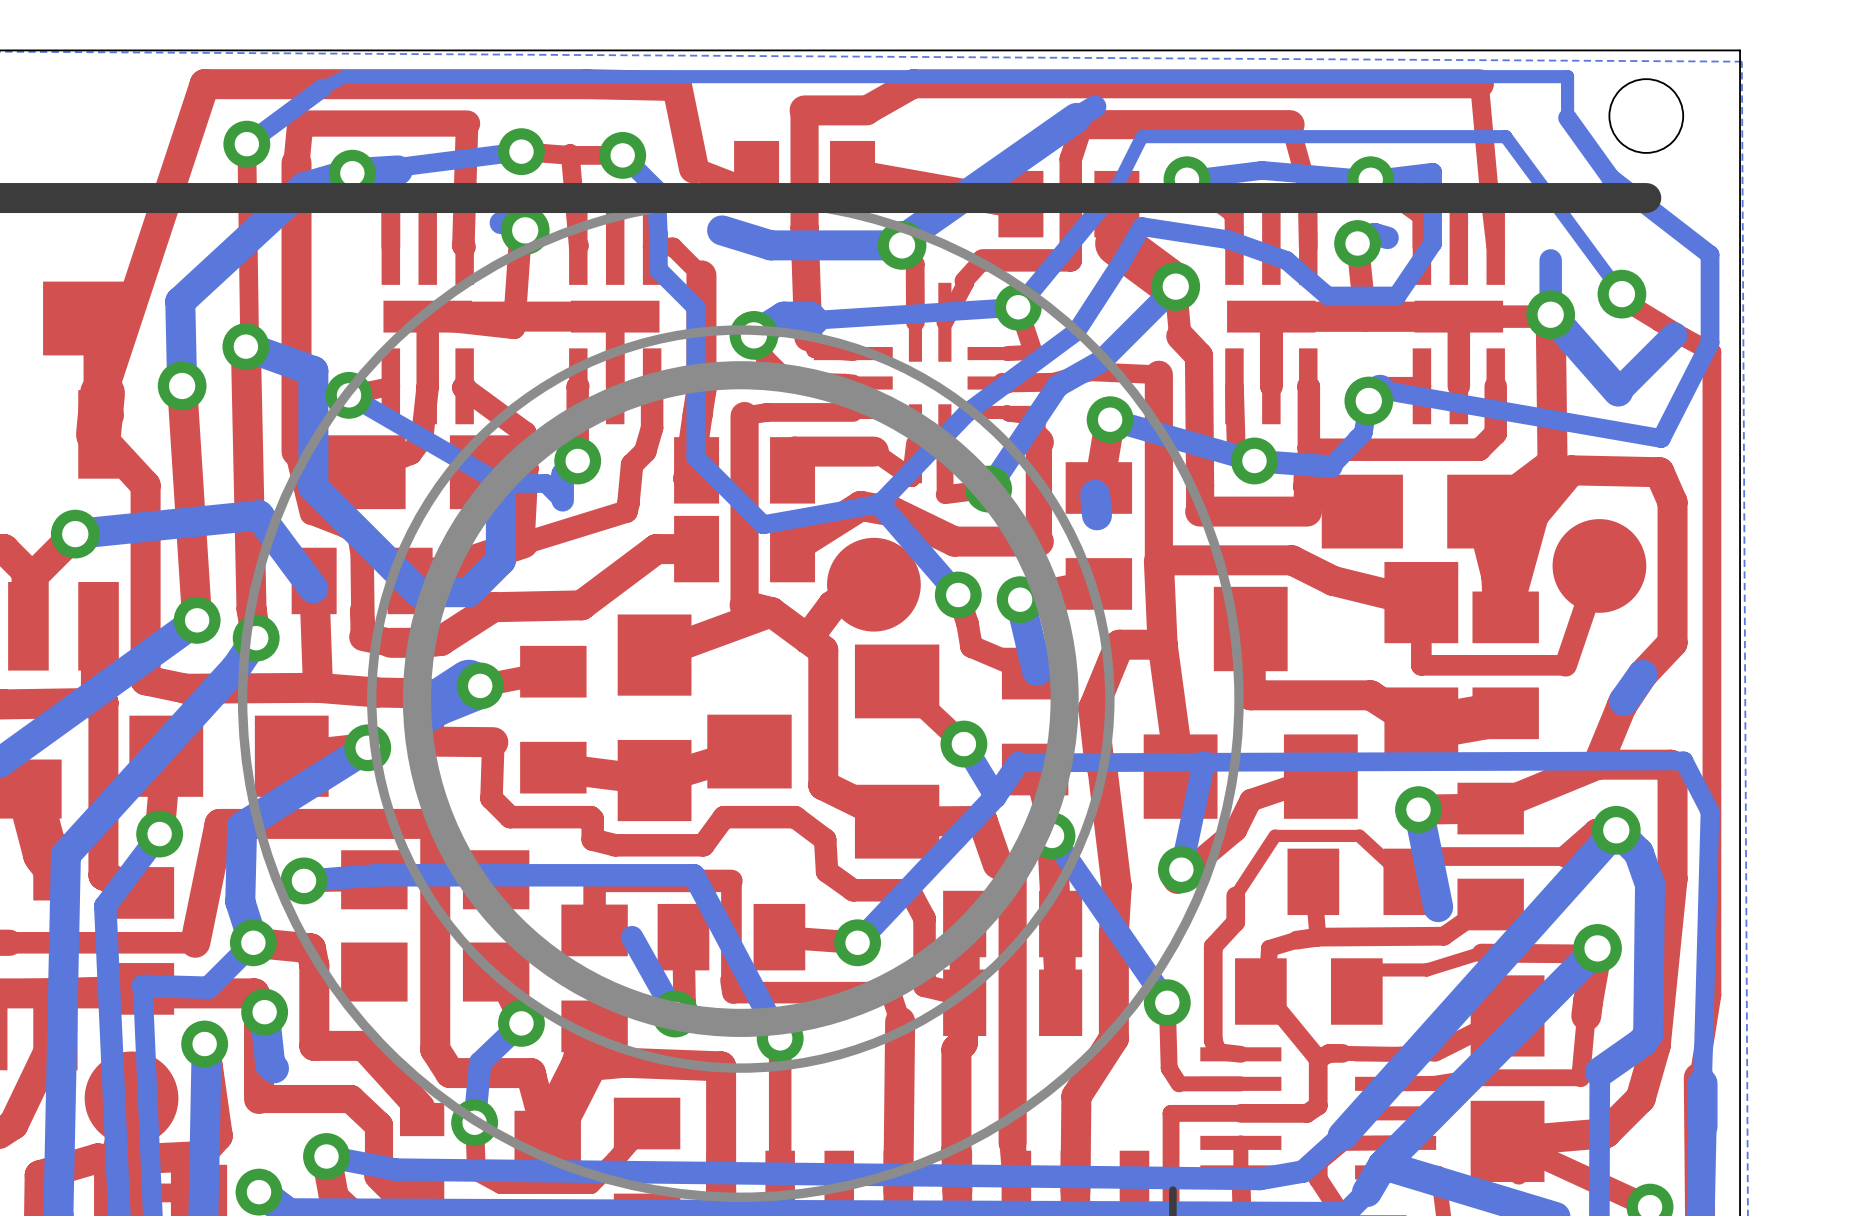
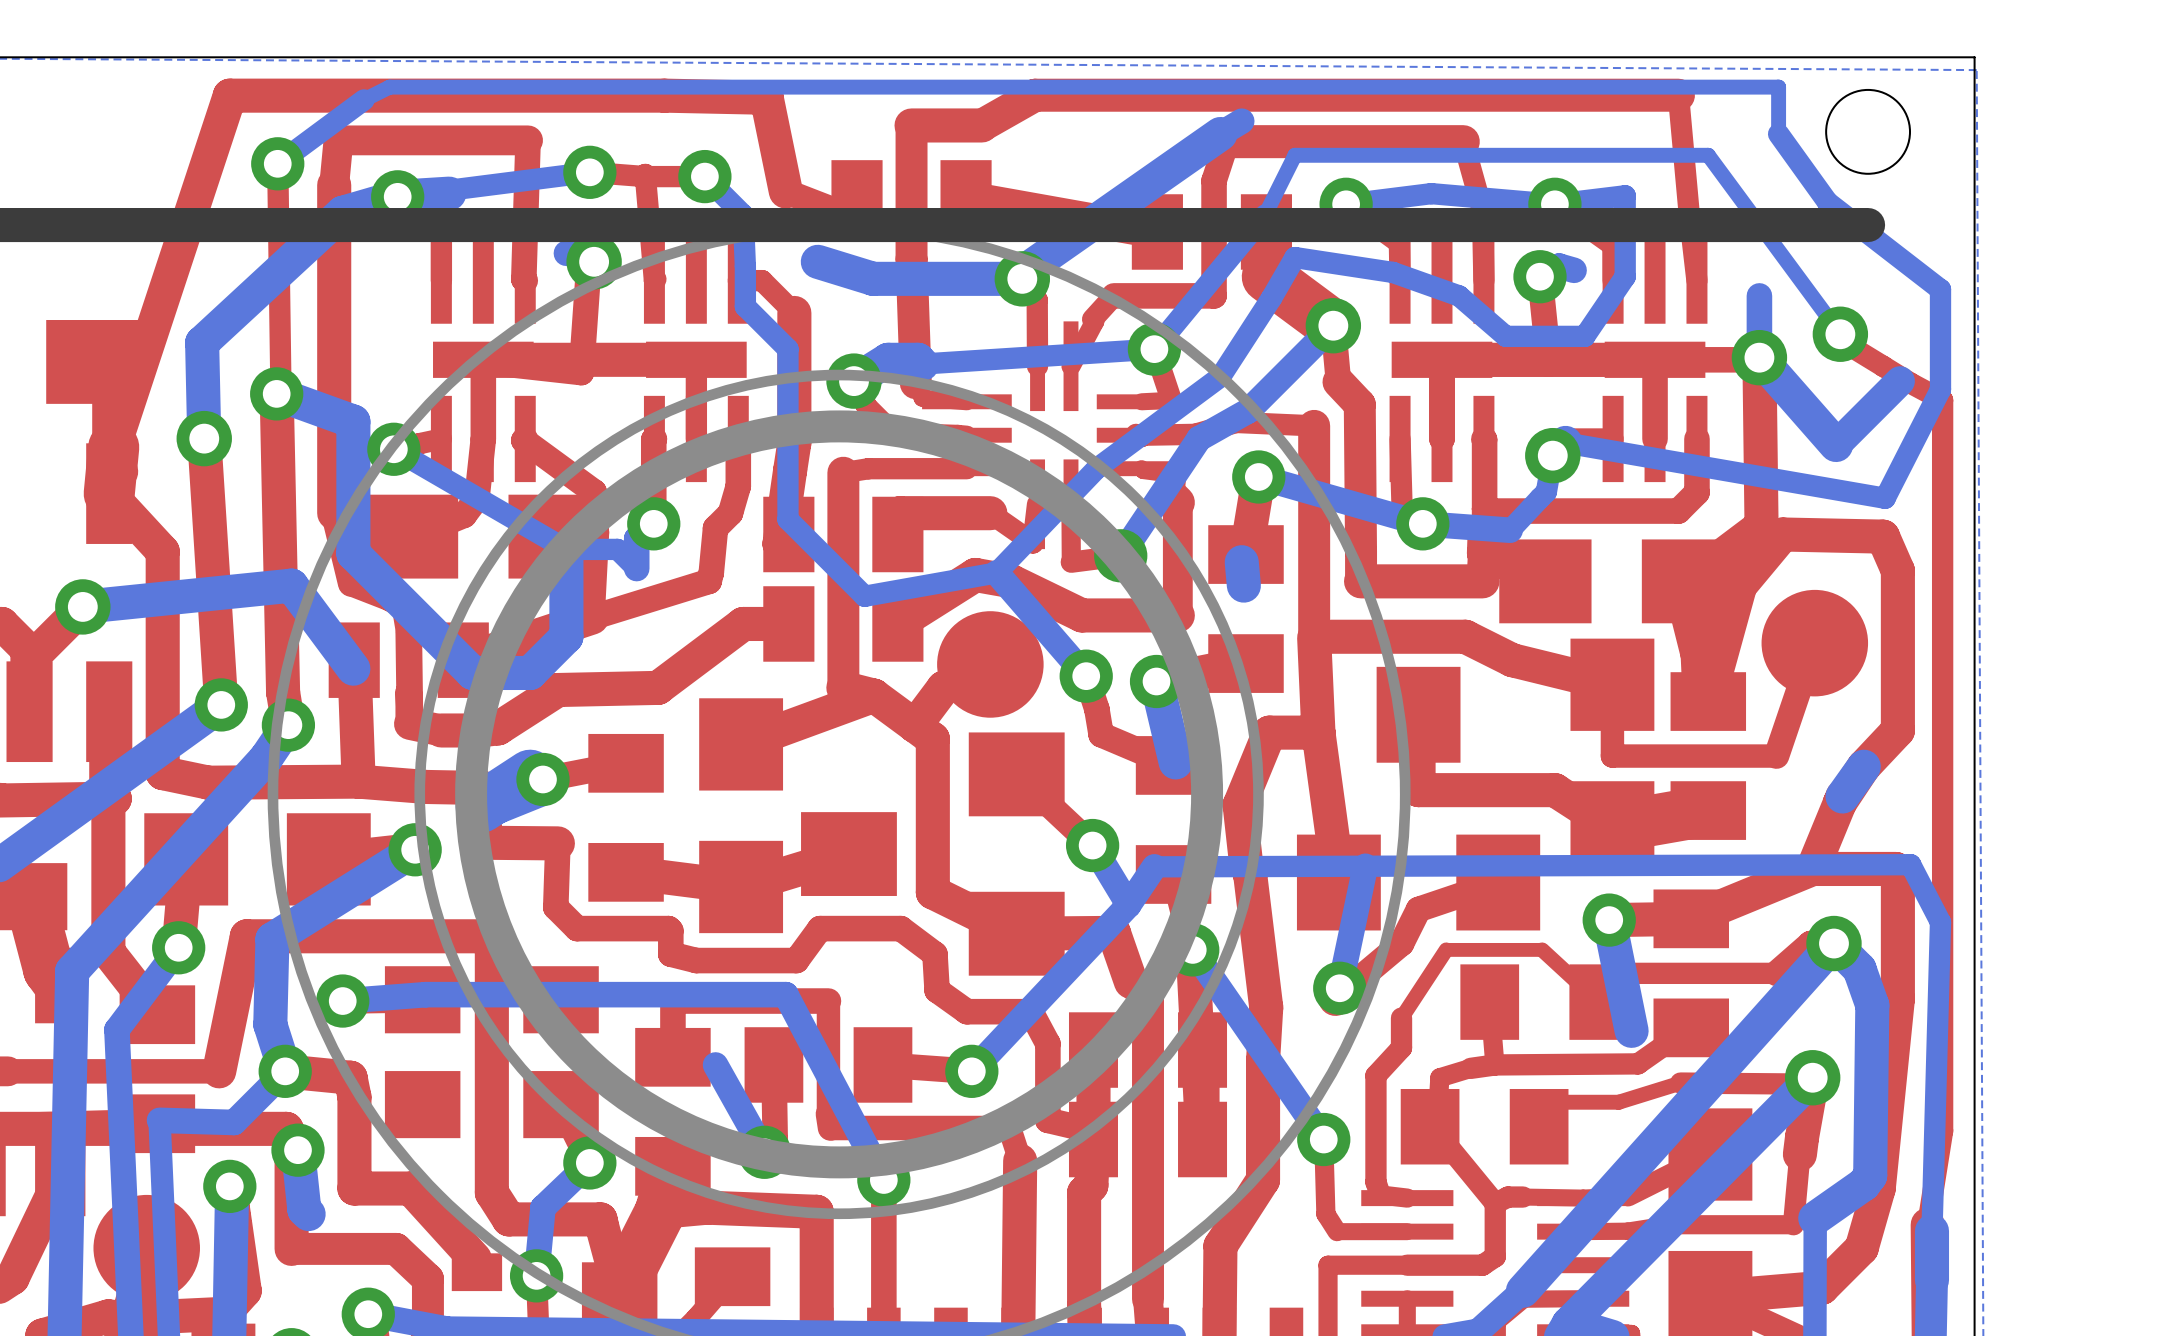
top track: (103, 702) (103, 875) (140, 892) -> (108, 796) (108, 952) (157, 1014)

